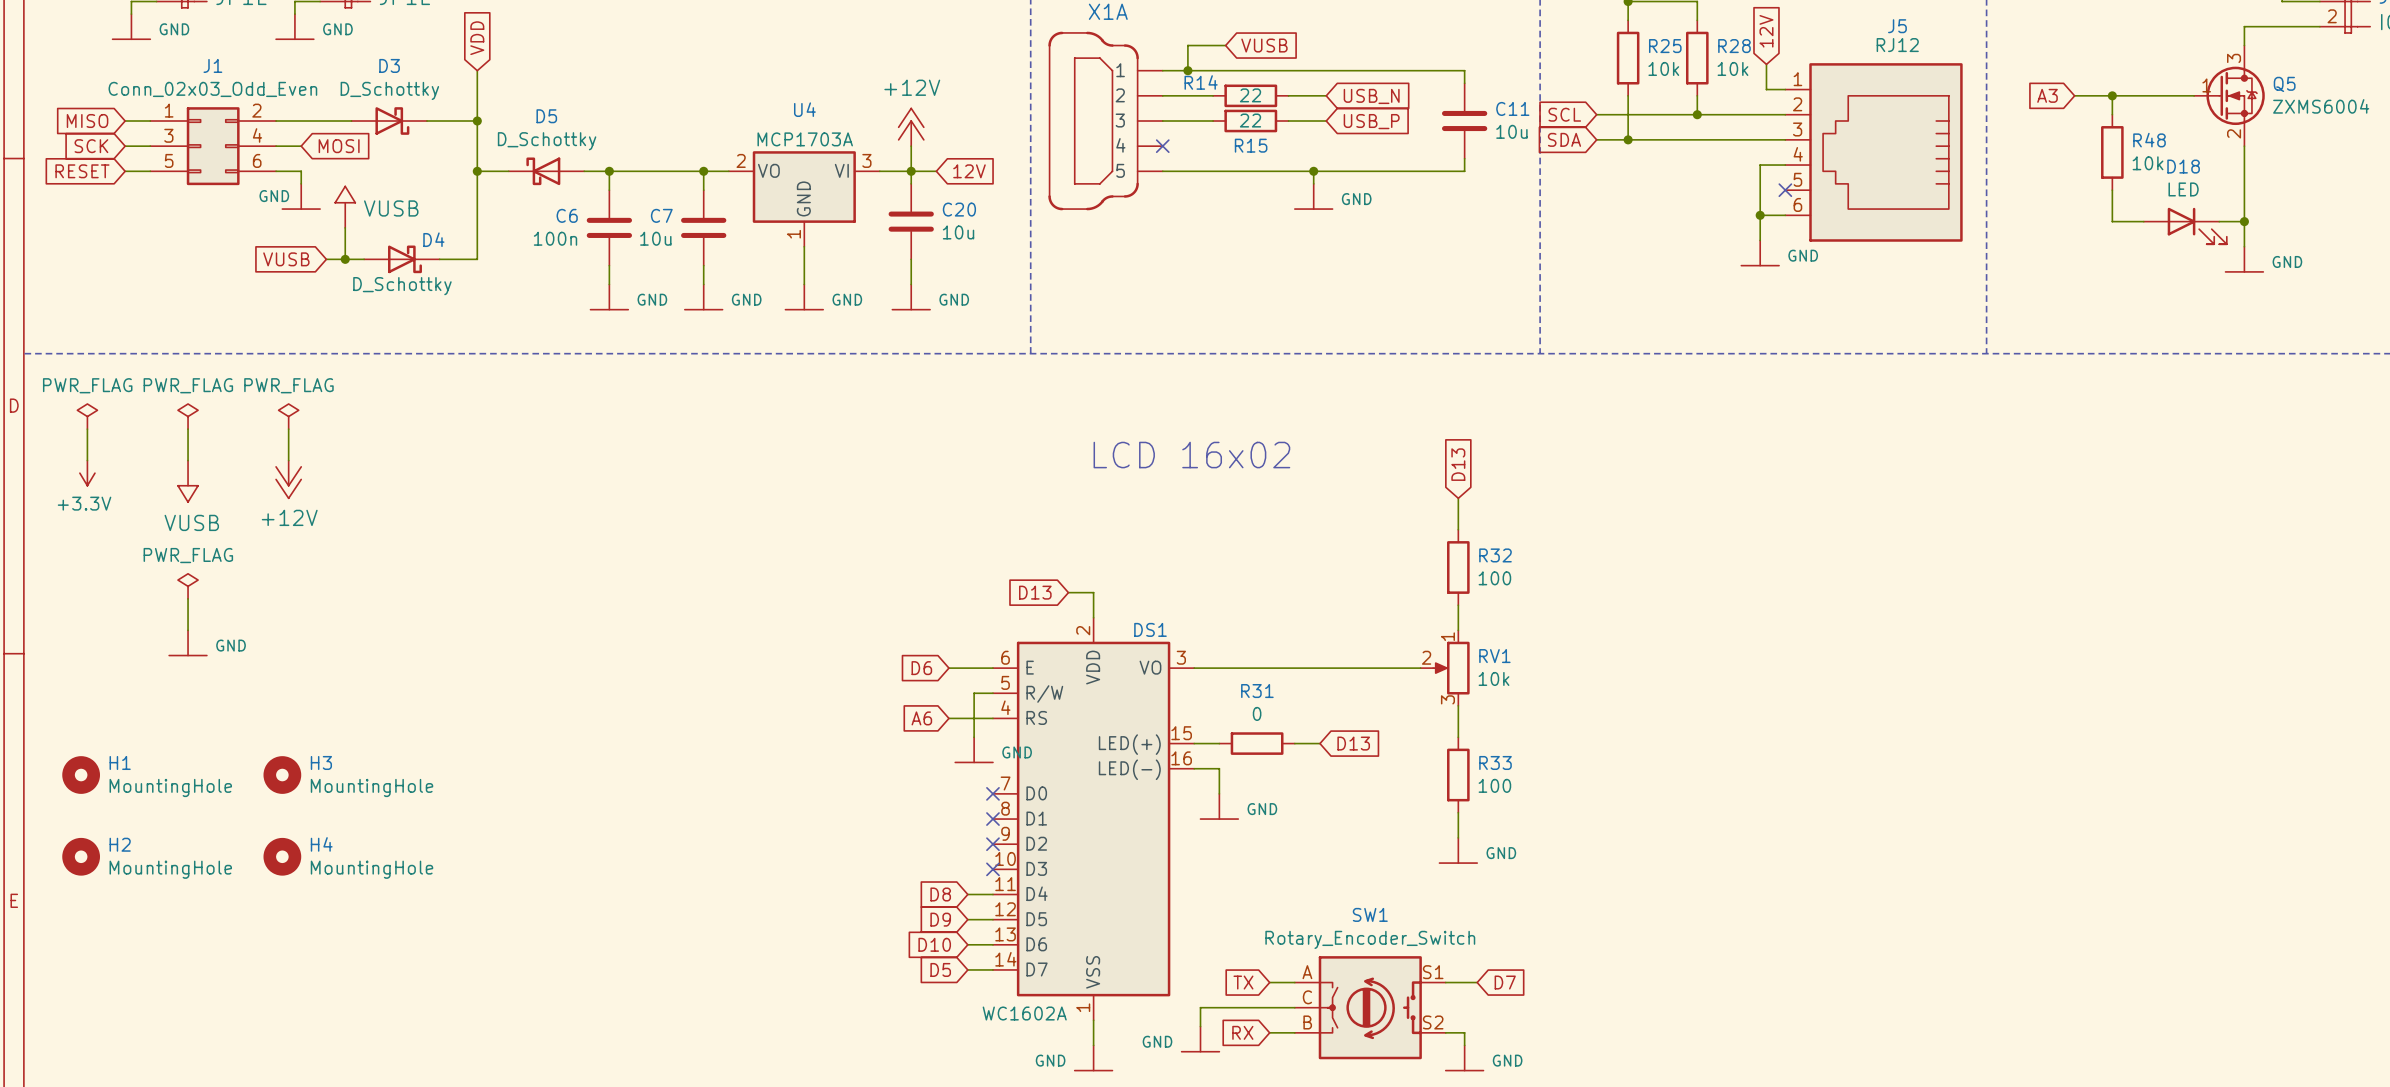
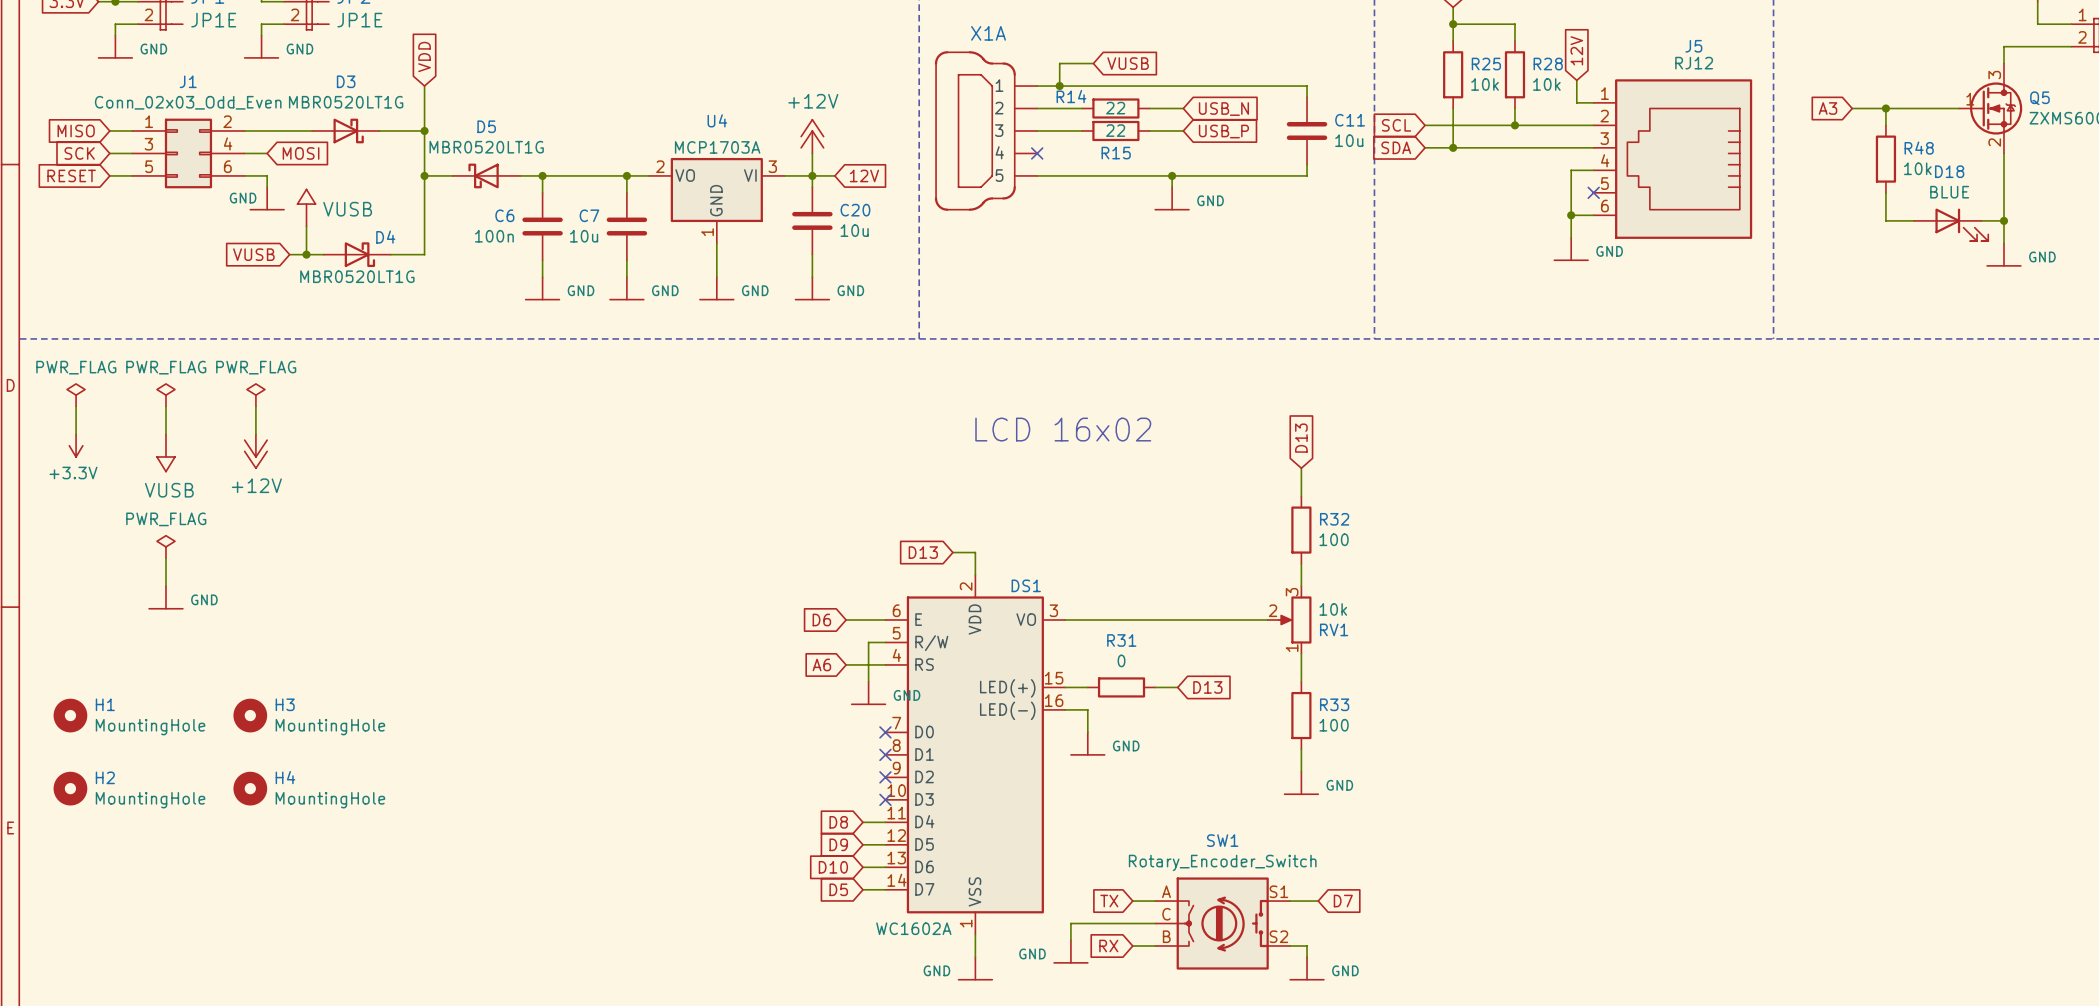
D3 value: D_Schottky (389, 90) -> MBR0520LT1G (346, 102)
D5 value: D_Schottky (547, 141) -> MBR0520LT1G (486, 147)
D18 value: LED (2183, 189) -> BLUE (1949, 192)
D4 value: D_Schottky (402, 286) -> MBR0520LT1G (357, 276)
RV1 flip: as is (1451, 668) -> up-down (1295, 620)

